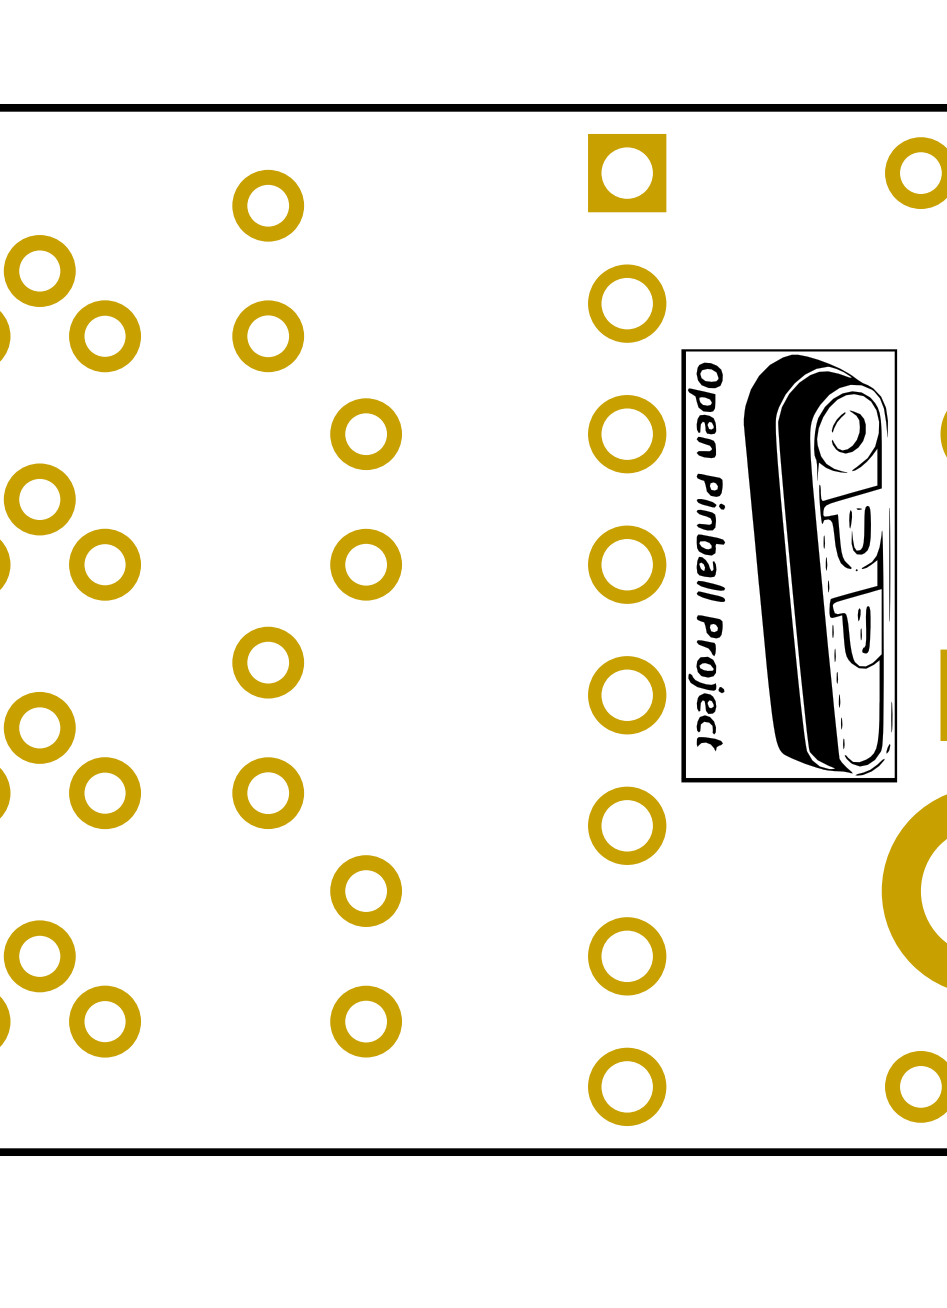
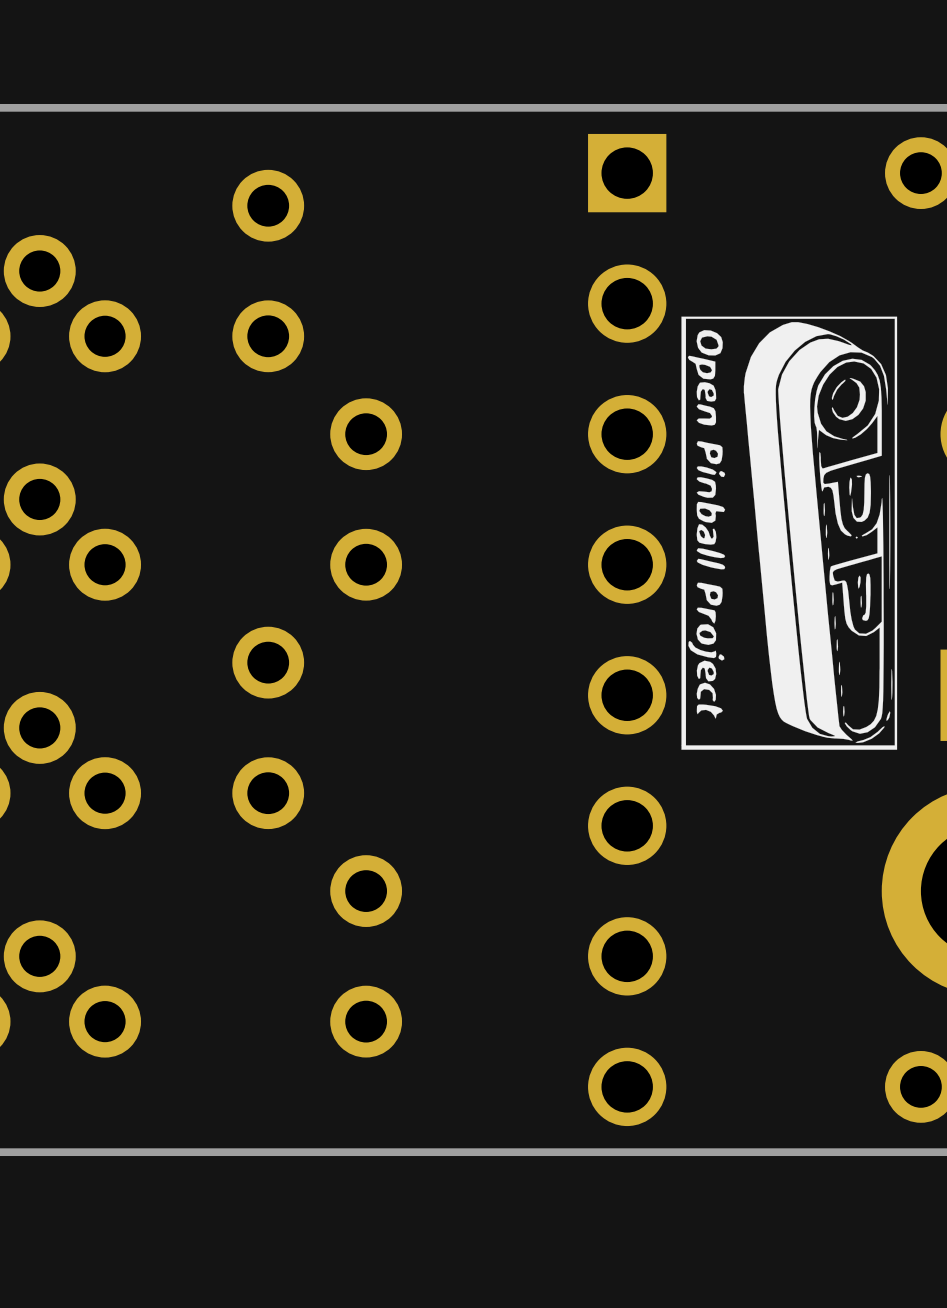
drawing position: (789, 565) -> (789, 533)

